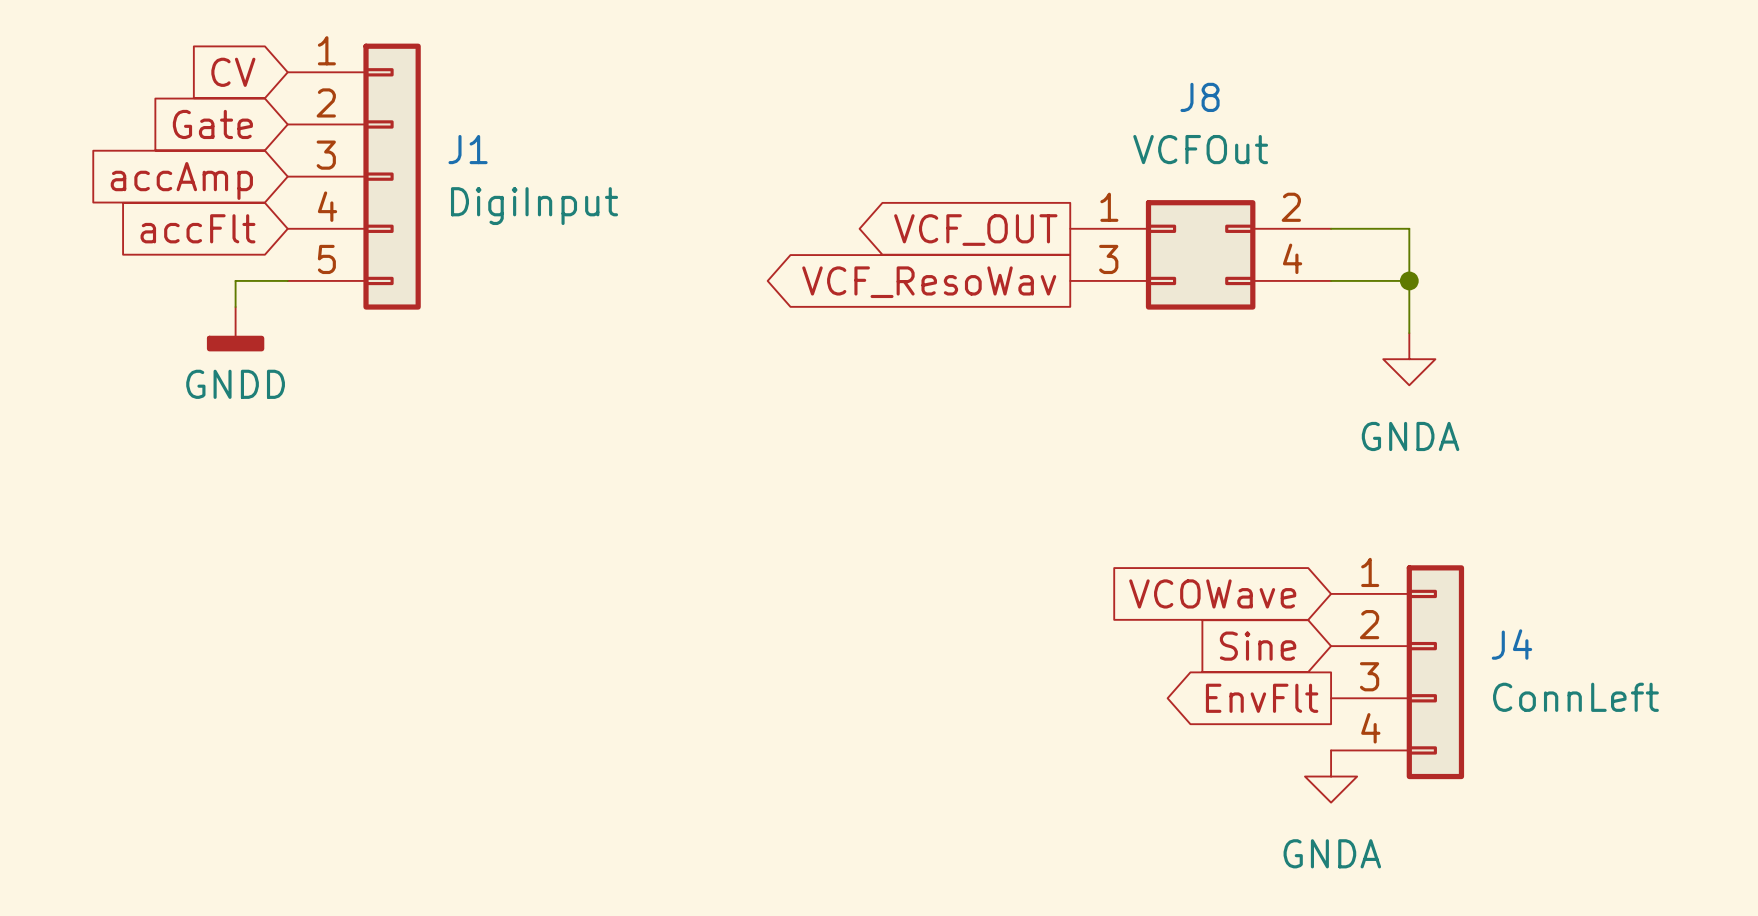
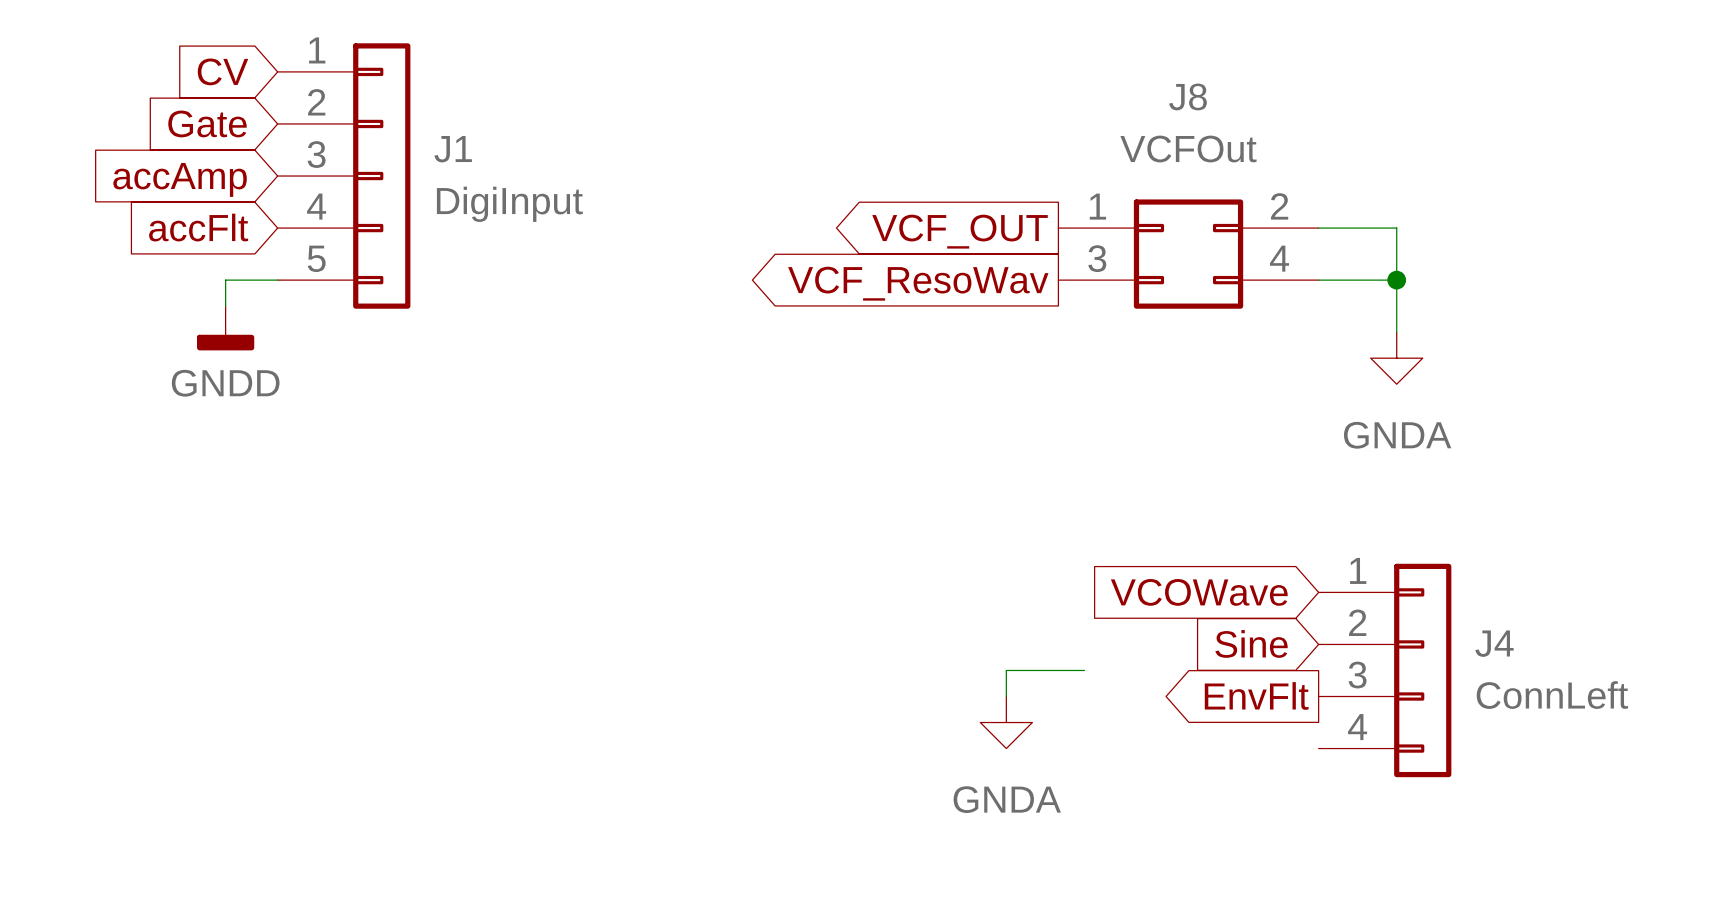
wire: none -> (1084, 670) (1006, 670) (1006, 696)
power symbol position: GNDA (1331, 776) -> GNDA (1006, 722)

